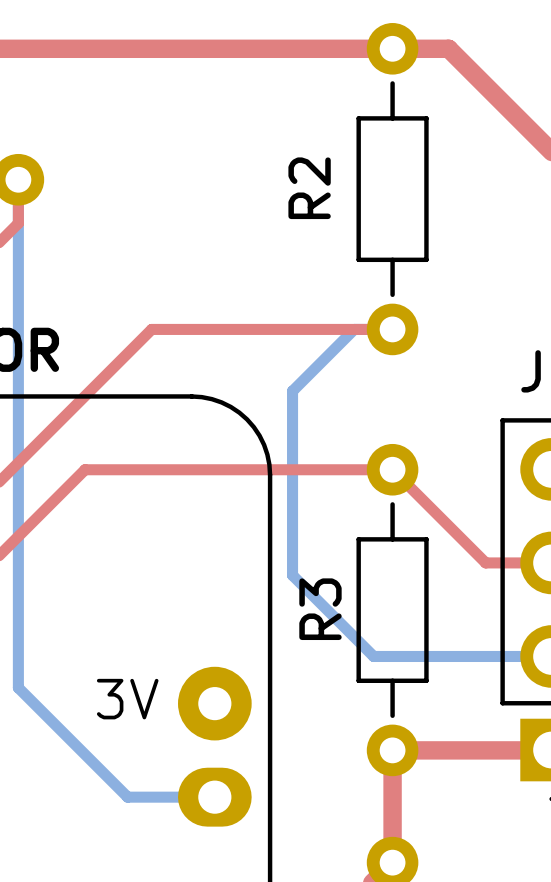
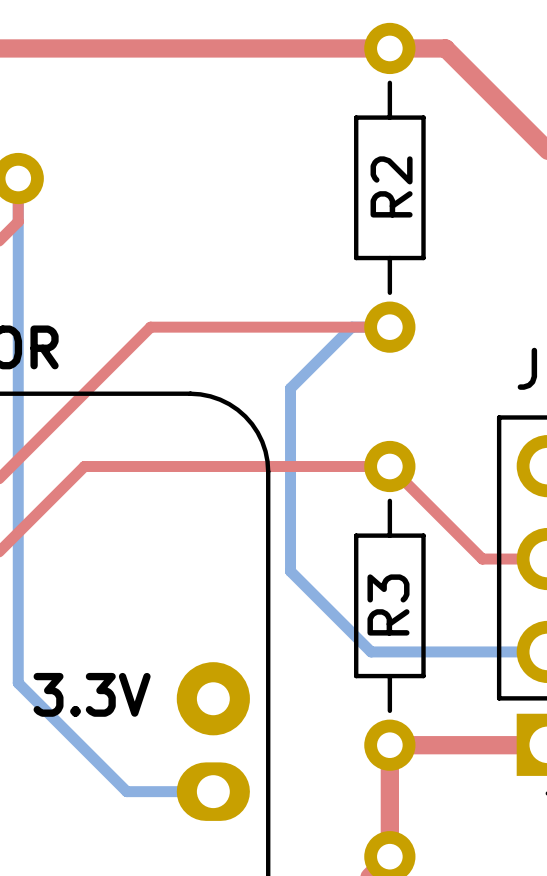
R2 name position: R2 (309, 188) -> R2 (391, 186)
R3 name position: R3 (320, 609) -> R3 (388, 604)
text: none -> 3.3V (92, 694)
part text: 3V (127, 699) -> none

